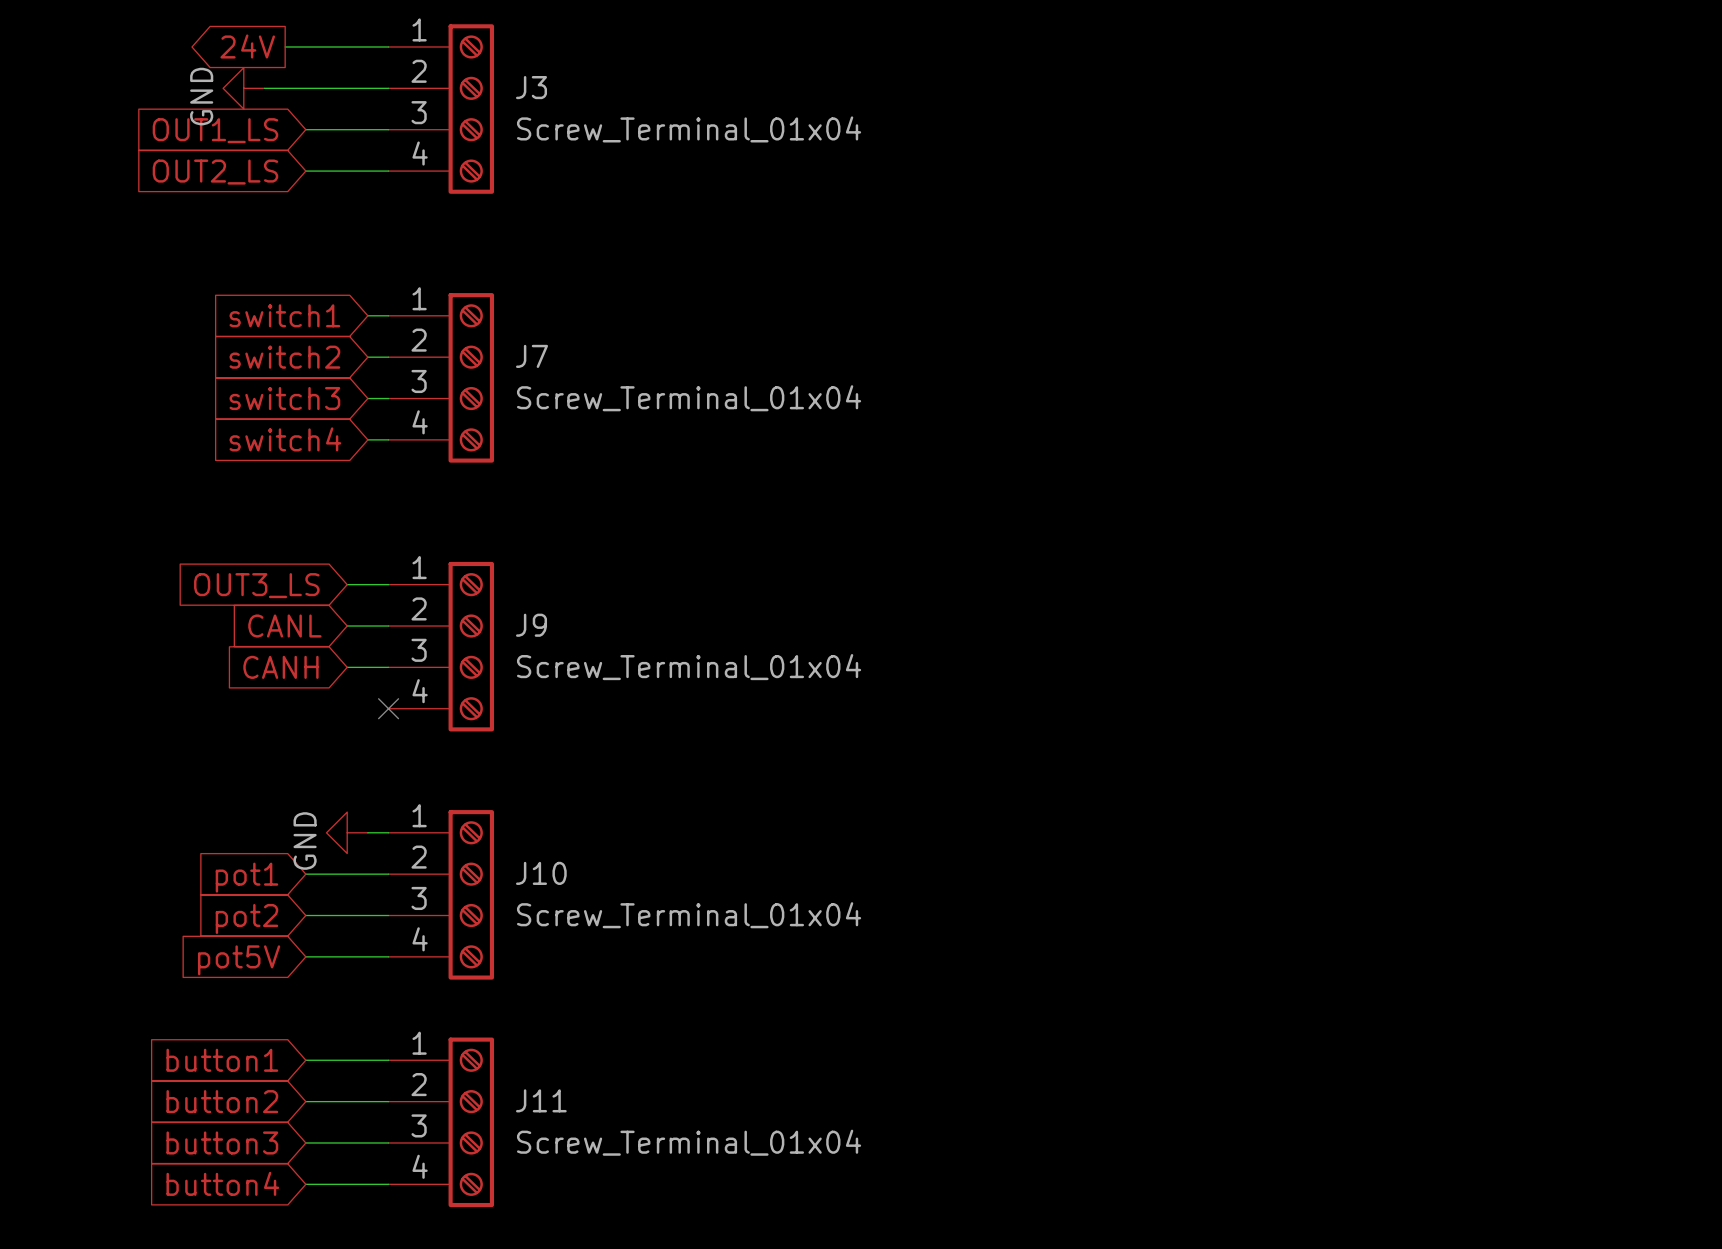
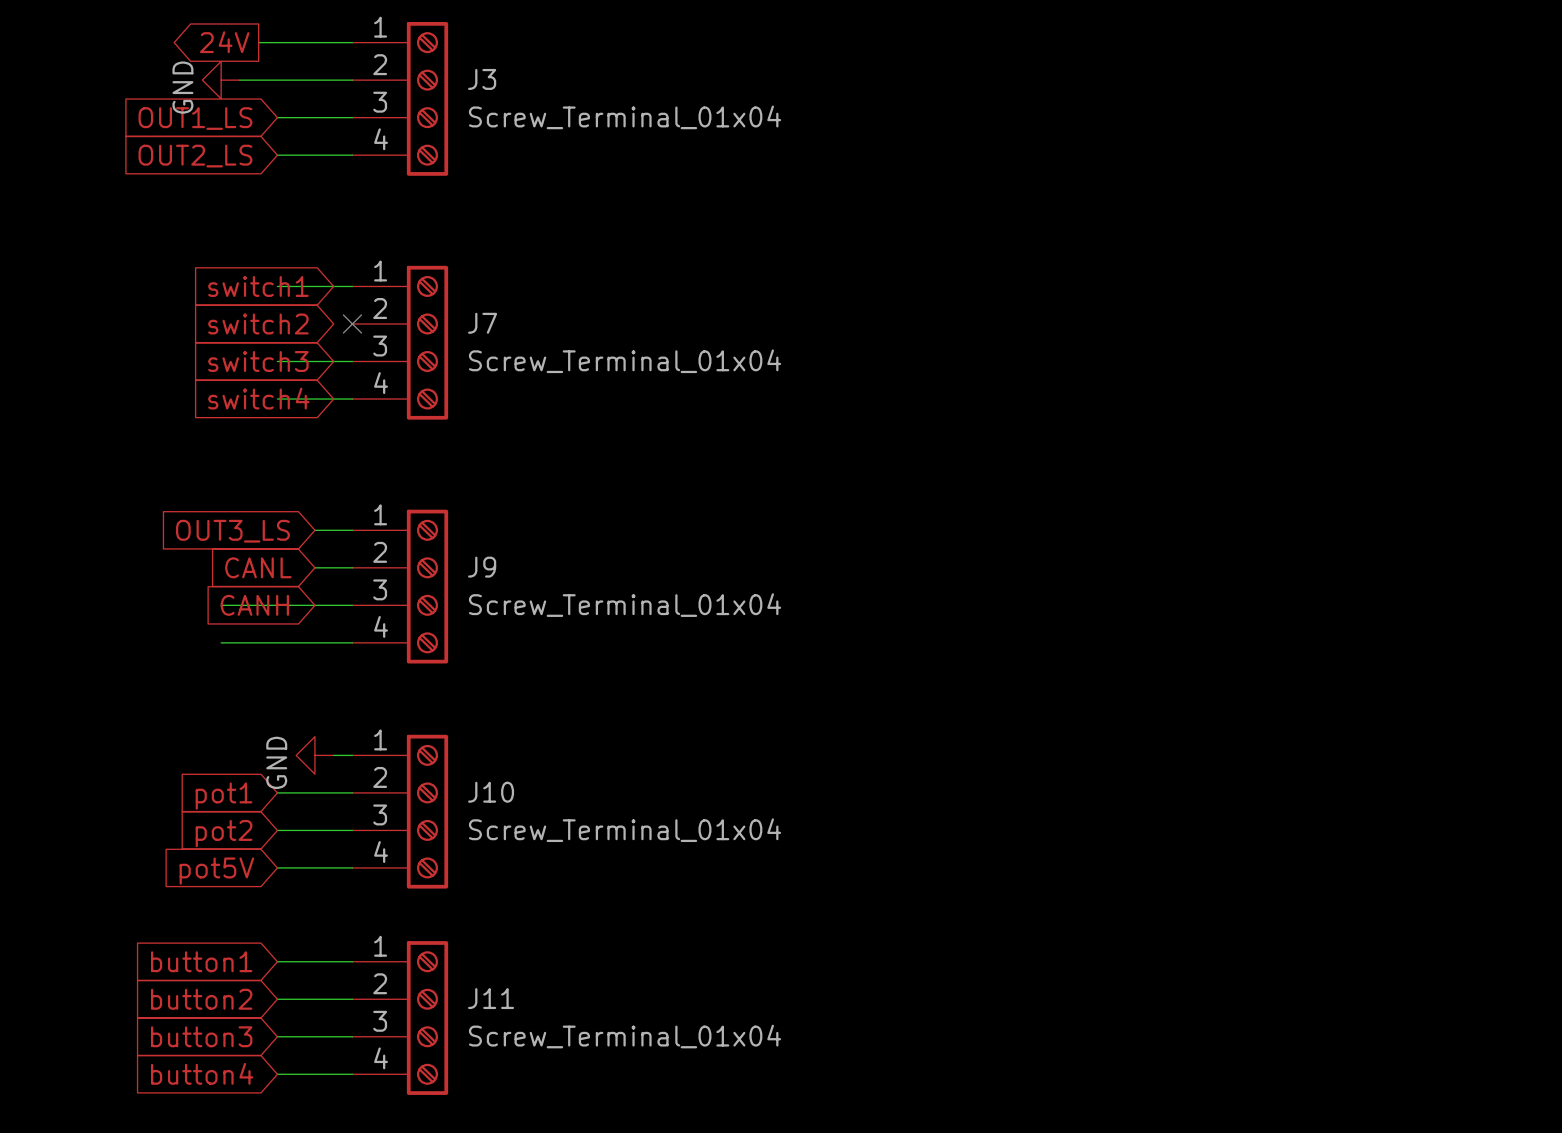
wire: none -> (277, 286) (333, 286)
wire: (367, 357) (388, 357) -> none
no-connect mark: none -> (352, 323)
wire: none -> (277, 361) (333, 361)
wire: none -> (277, 399) (333, 399)
wire: none -> (221, 605) (314, 605)
wire: none -> (221, 642) (352, 642)
no-connect mark: (388, 708) -> none

